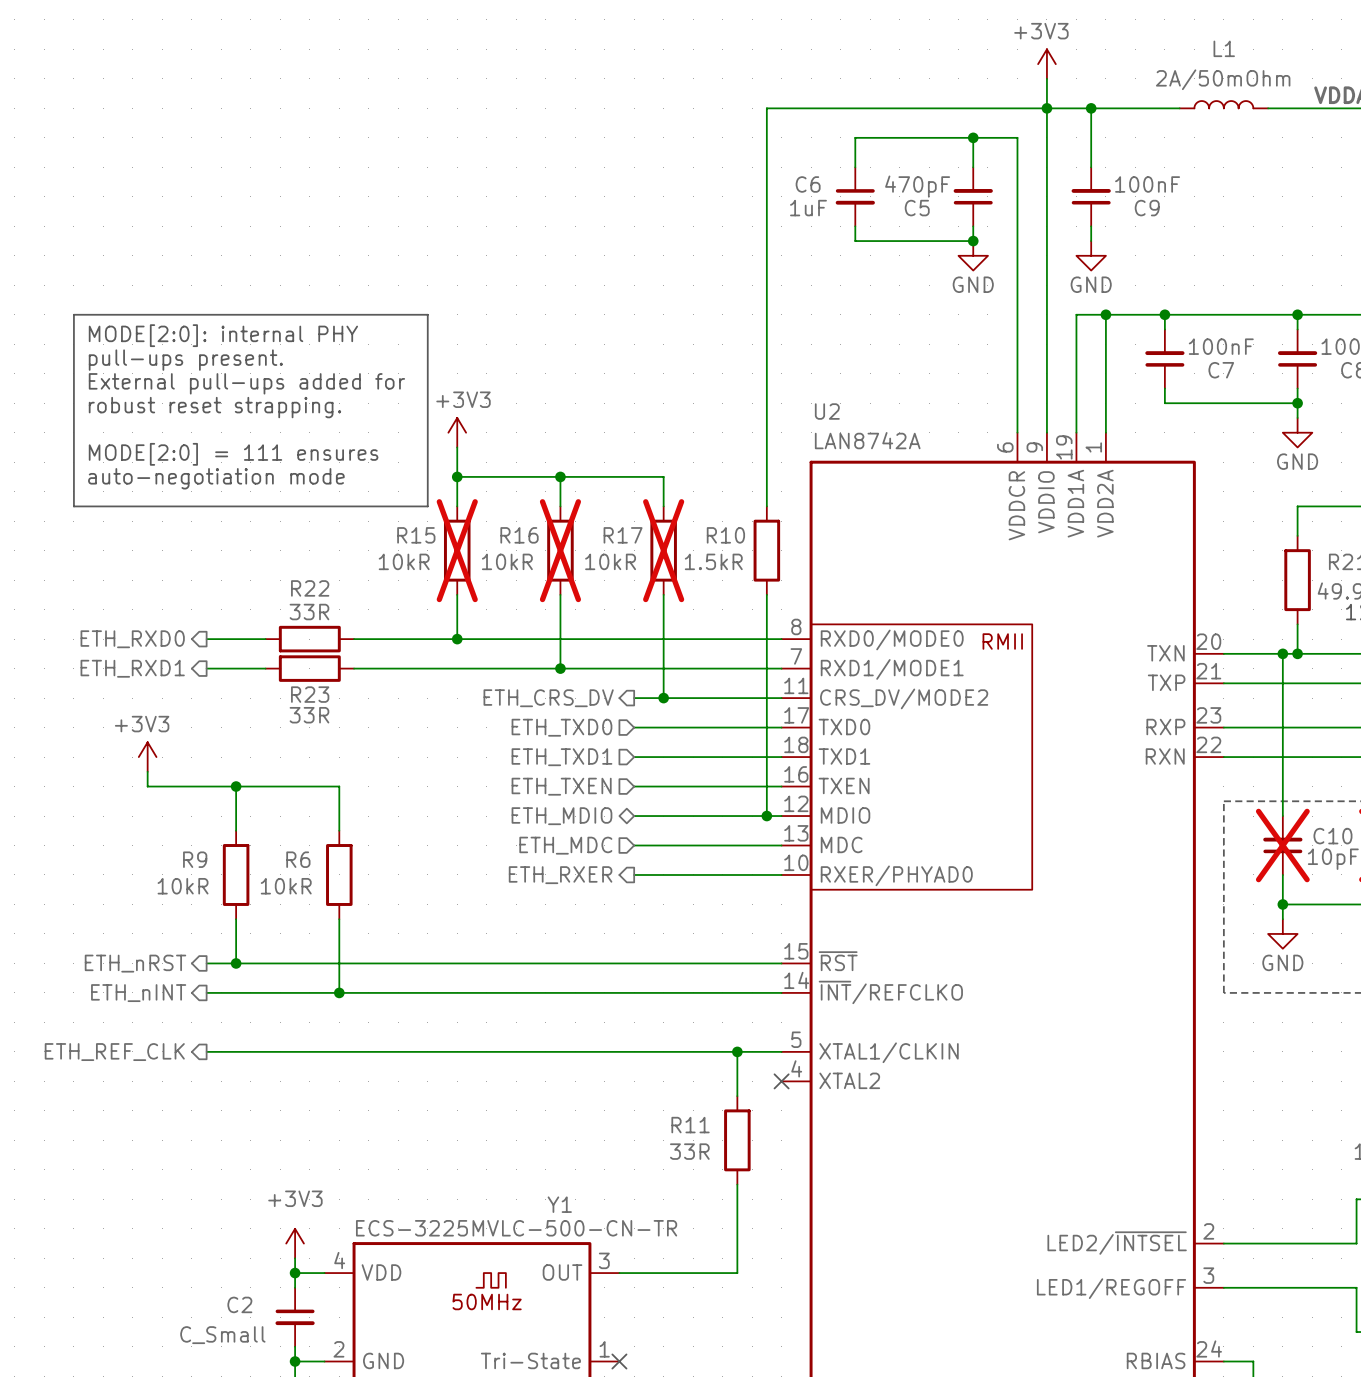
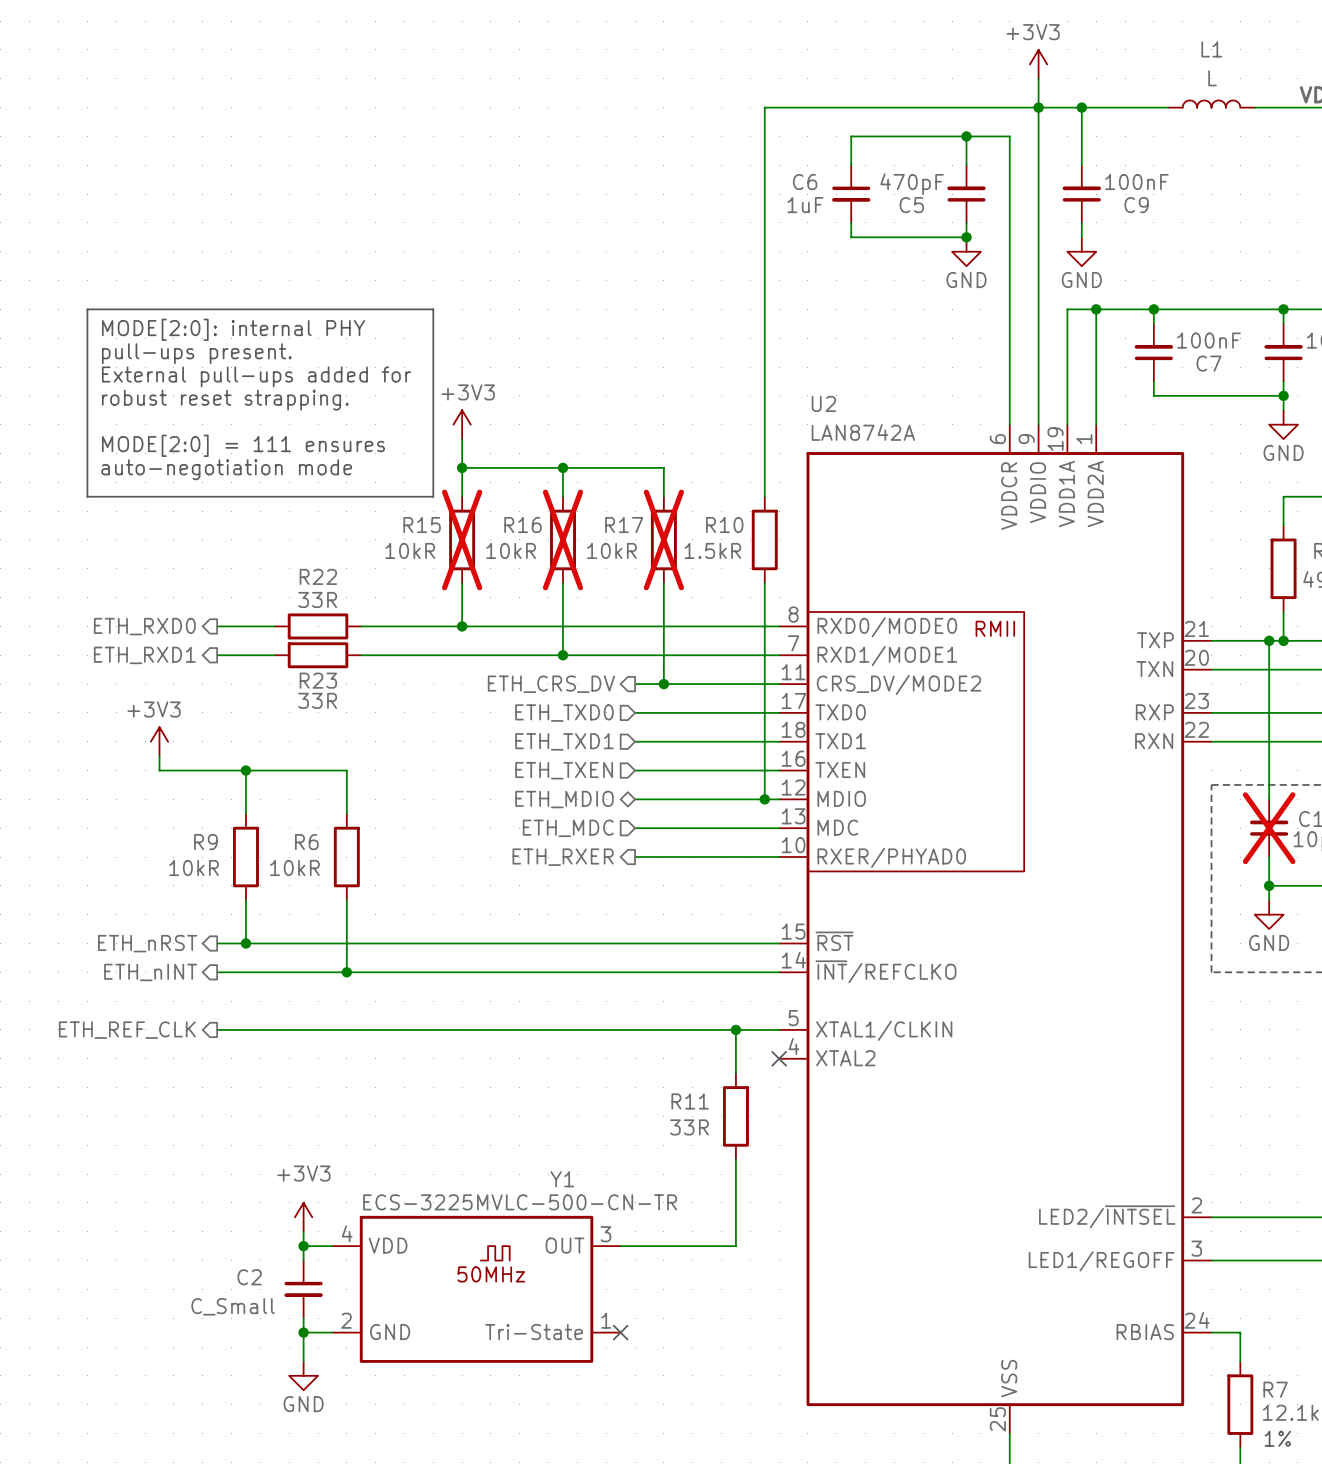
L1 value: 2A/50mOhm (1223, 79) -> L (1212, 78)
U2 pin number: 20 (1208, 641) -> 21 (1196, 628)
U2 pin name: TXN (1165, 653) -> TXP (1155, 640)
U2 pin number: 21 (1208, 671) -> 20 (1196, 657)
U2 pin name: TXP (1166, 682) -> TXN (1154, 669)

